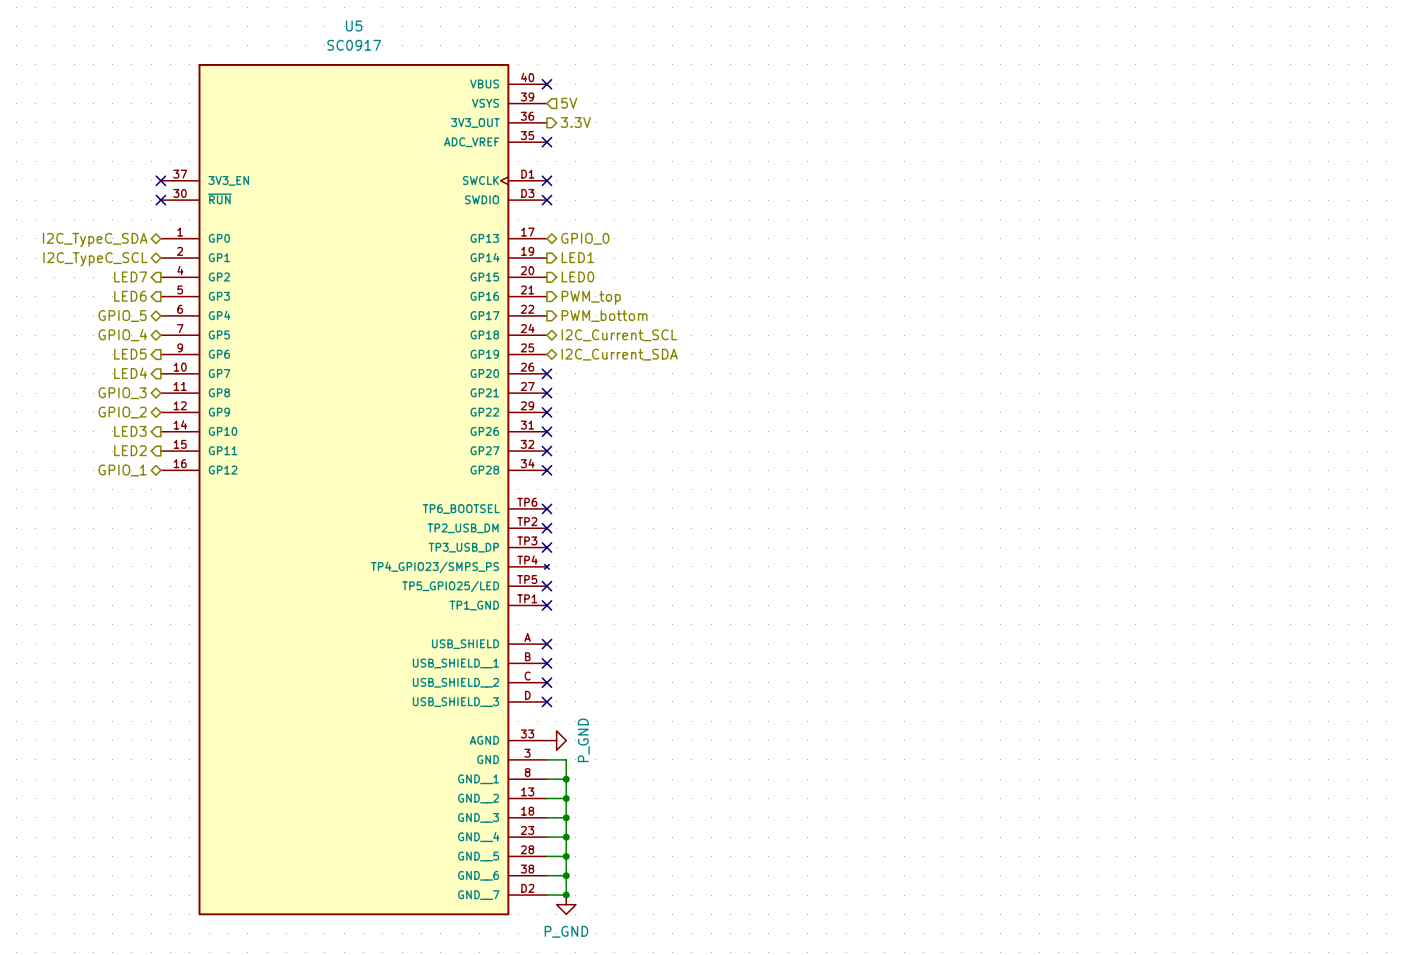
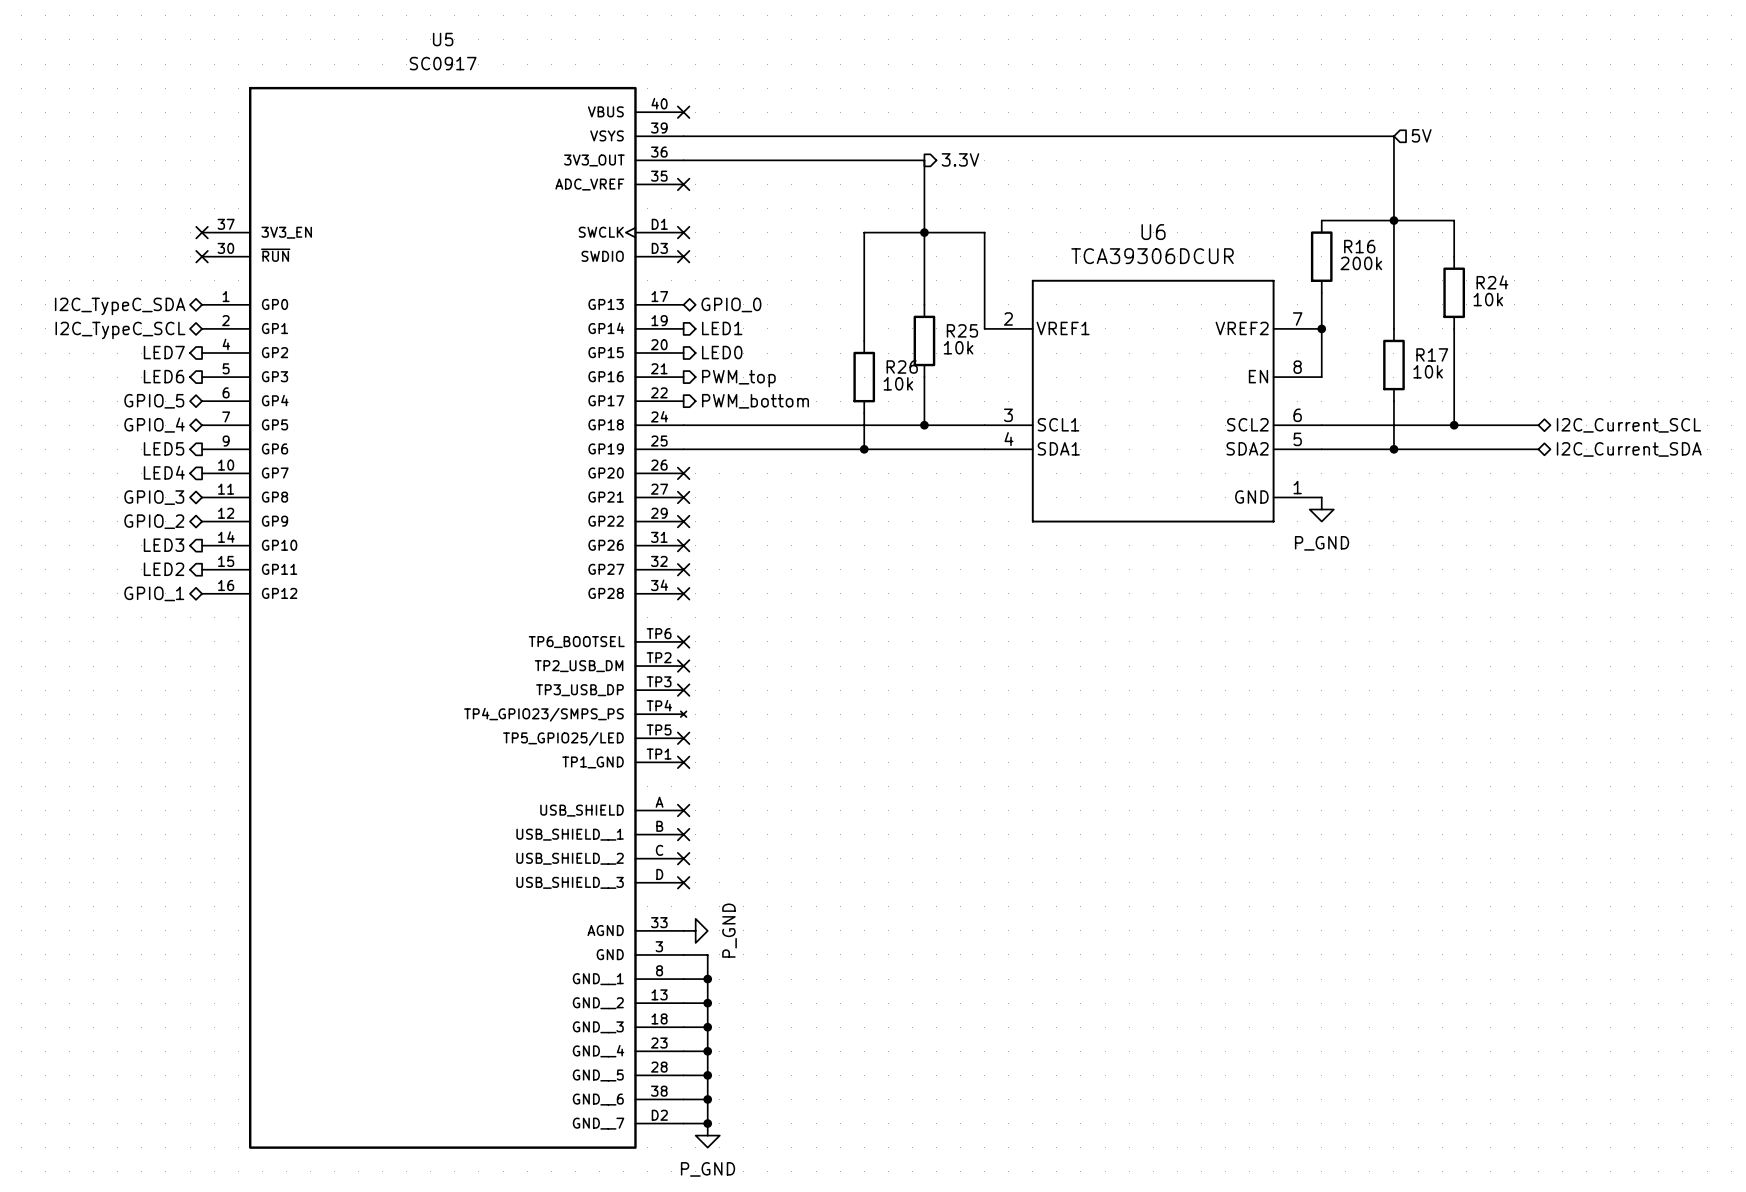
wire: none -> (683, 136) (1393, 136) (1393, 328)
hierarchical label: 5V (569, 103) -> none
hierarchical label: none -> 5V (1421, 135)
wire: none -> (683, 160) (924, 160) (924, 304)
hierarchical label: 3.3V (575, 122) -> none
hierarchical label: none -> 3.3V (960, 159)
wire: none -> (1321, 220) (1454, 220) (1454, 256)
junction: none -> (1393, 220)
junction: none -> (924, 232)
R16: none -> 200k (1321, 256)
wire: none -> (1321, 292) (1321, 377)
R24: none -> 10k (1454, 292)
wire: none -> (984, 328) (984, 232) (864, 232) (864, 340)
junction: none -> (1321, 328)
wire: none -> (1454, 328) (1454, 425)
R25: none -> 10k (924, 340)
R17: none -> 10k (1393, 365)
R26: none -> 10k (864, 377)
wire: none -> (924, 377) (924, 425)
U6: none -> TCA39306DCUR (1153, 401)
wire: none -> (1393, 401) (1393, 449)
wire: none -> (864, 413) (864, 449)
wire: none -> (683, 425) (984, 425)
hierarchical label: I2C_Current_SCL (619, 335) -> none
junction: none -> (924, 425)
wire: none -> (1321, 425) (1538, 425)
junction: none -> (1454, 425)
hierarchical label: none -> I2C_Current_SCL (1628, 425)
wire: none -> (683, 449) (984, 449)
hierarchical label: I2C_Current_SDA (619, 354) -> none
junction: none -> (864, 449)
wire: none -> (1321, 449) (1538, 449)
junction: none -> (1393, 449)
hierarchical label: none -> I2C_Current_SDA (1629, 449)
power symbol: none -> P_GND (1321, 509)

